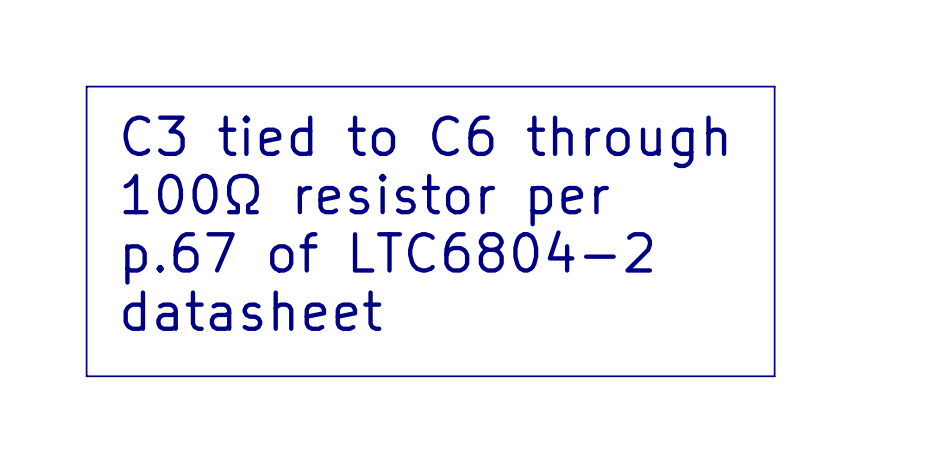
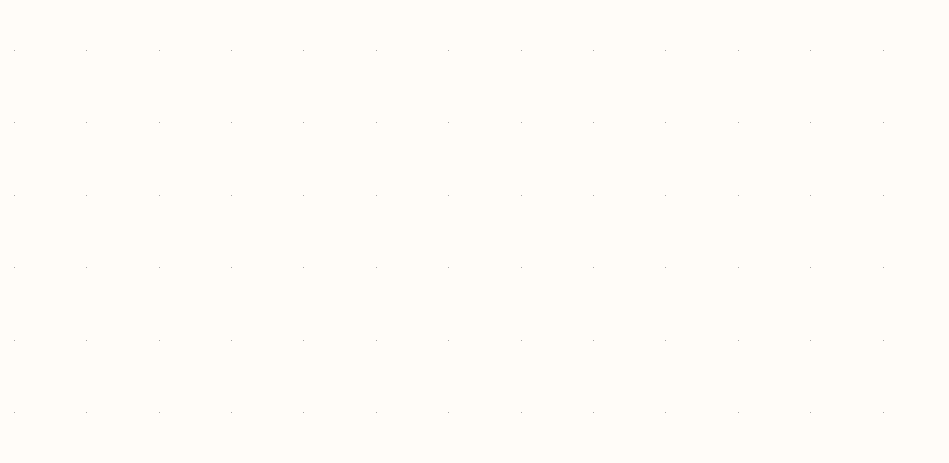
line: (86, 86) (774, 86) (774, 376) (86, 376) (86, 86) -> none
text: C3 tied to C6 through (424, 141) -> none
text: 100Ω resistor per (366, 200) -> none
text: p.67 of LTC6804-2 (388, 257) -> none
text: datasheet (252, 310) -> none

